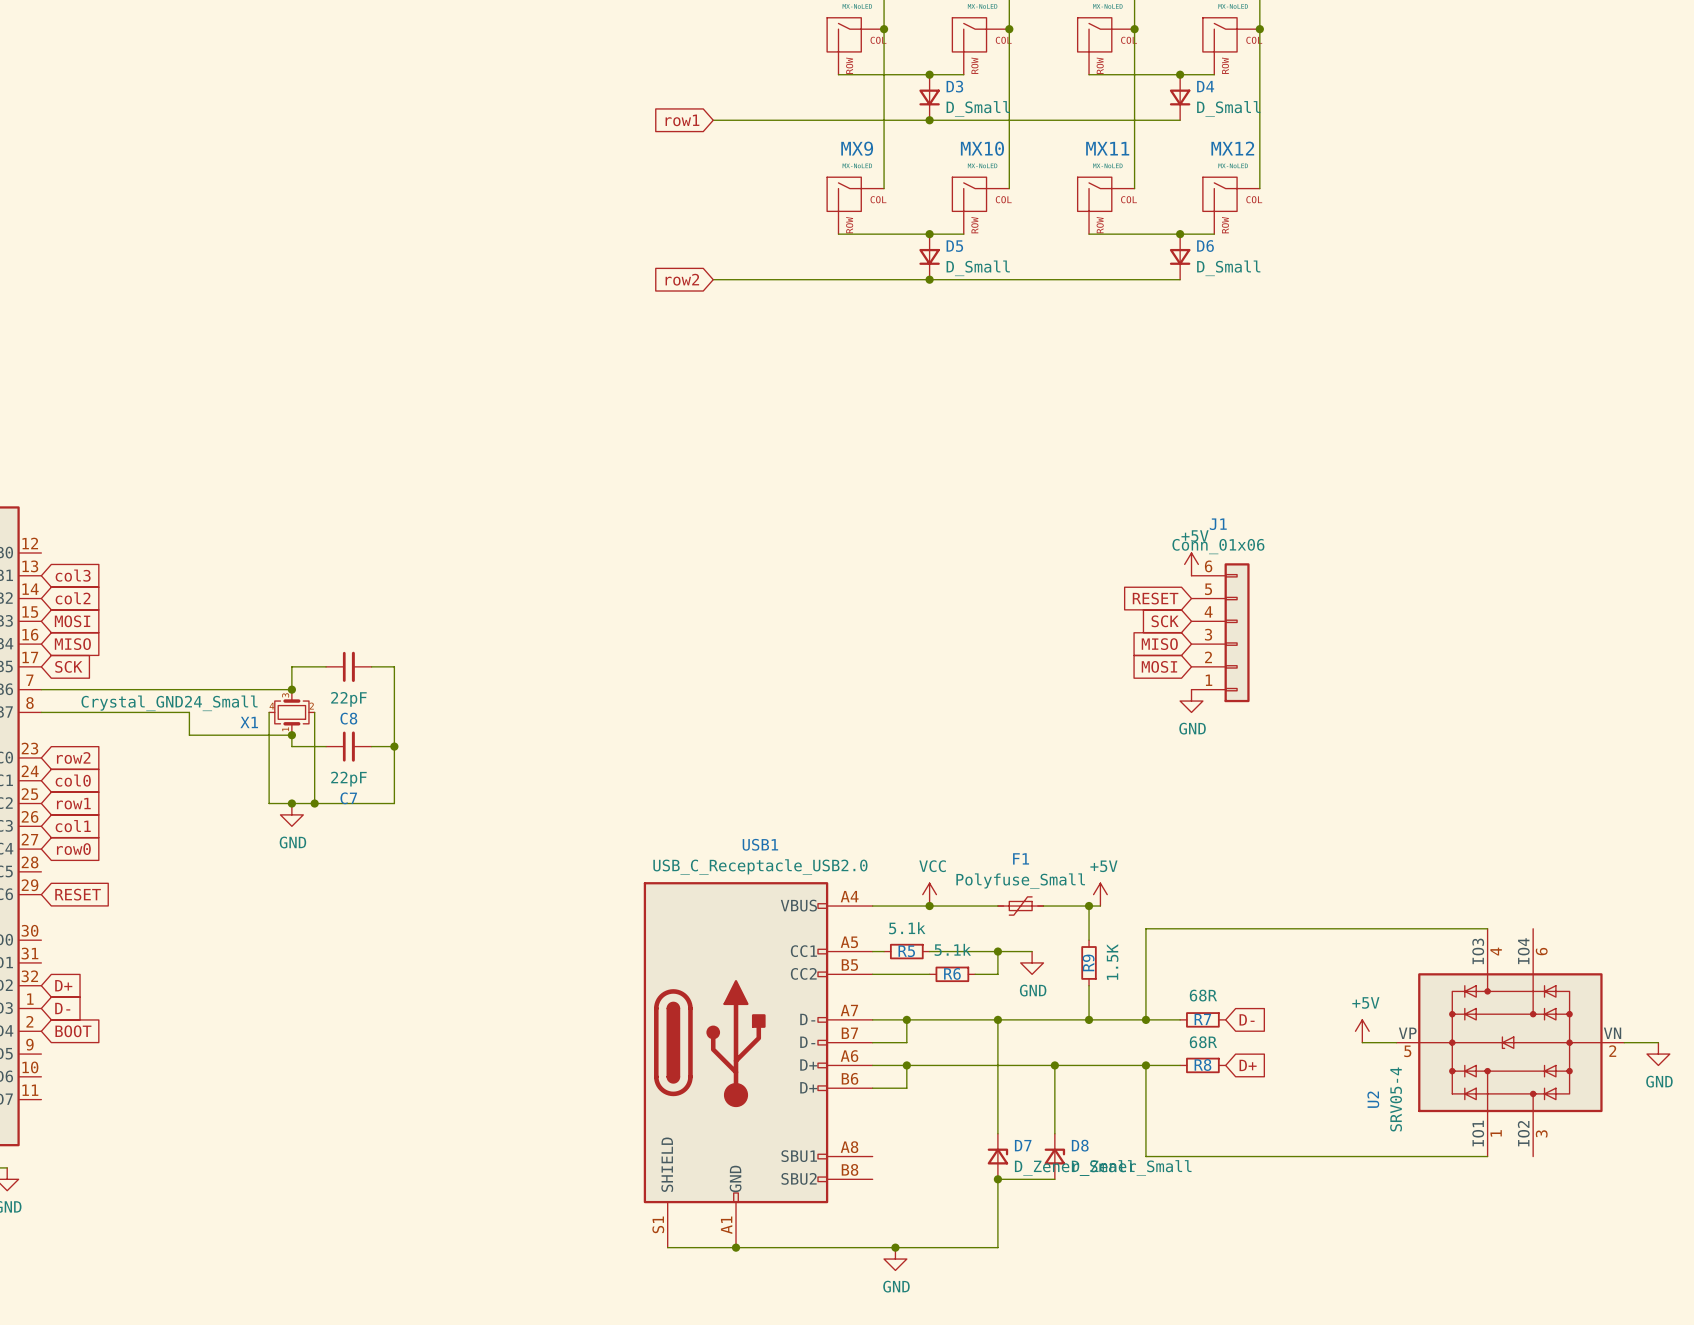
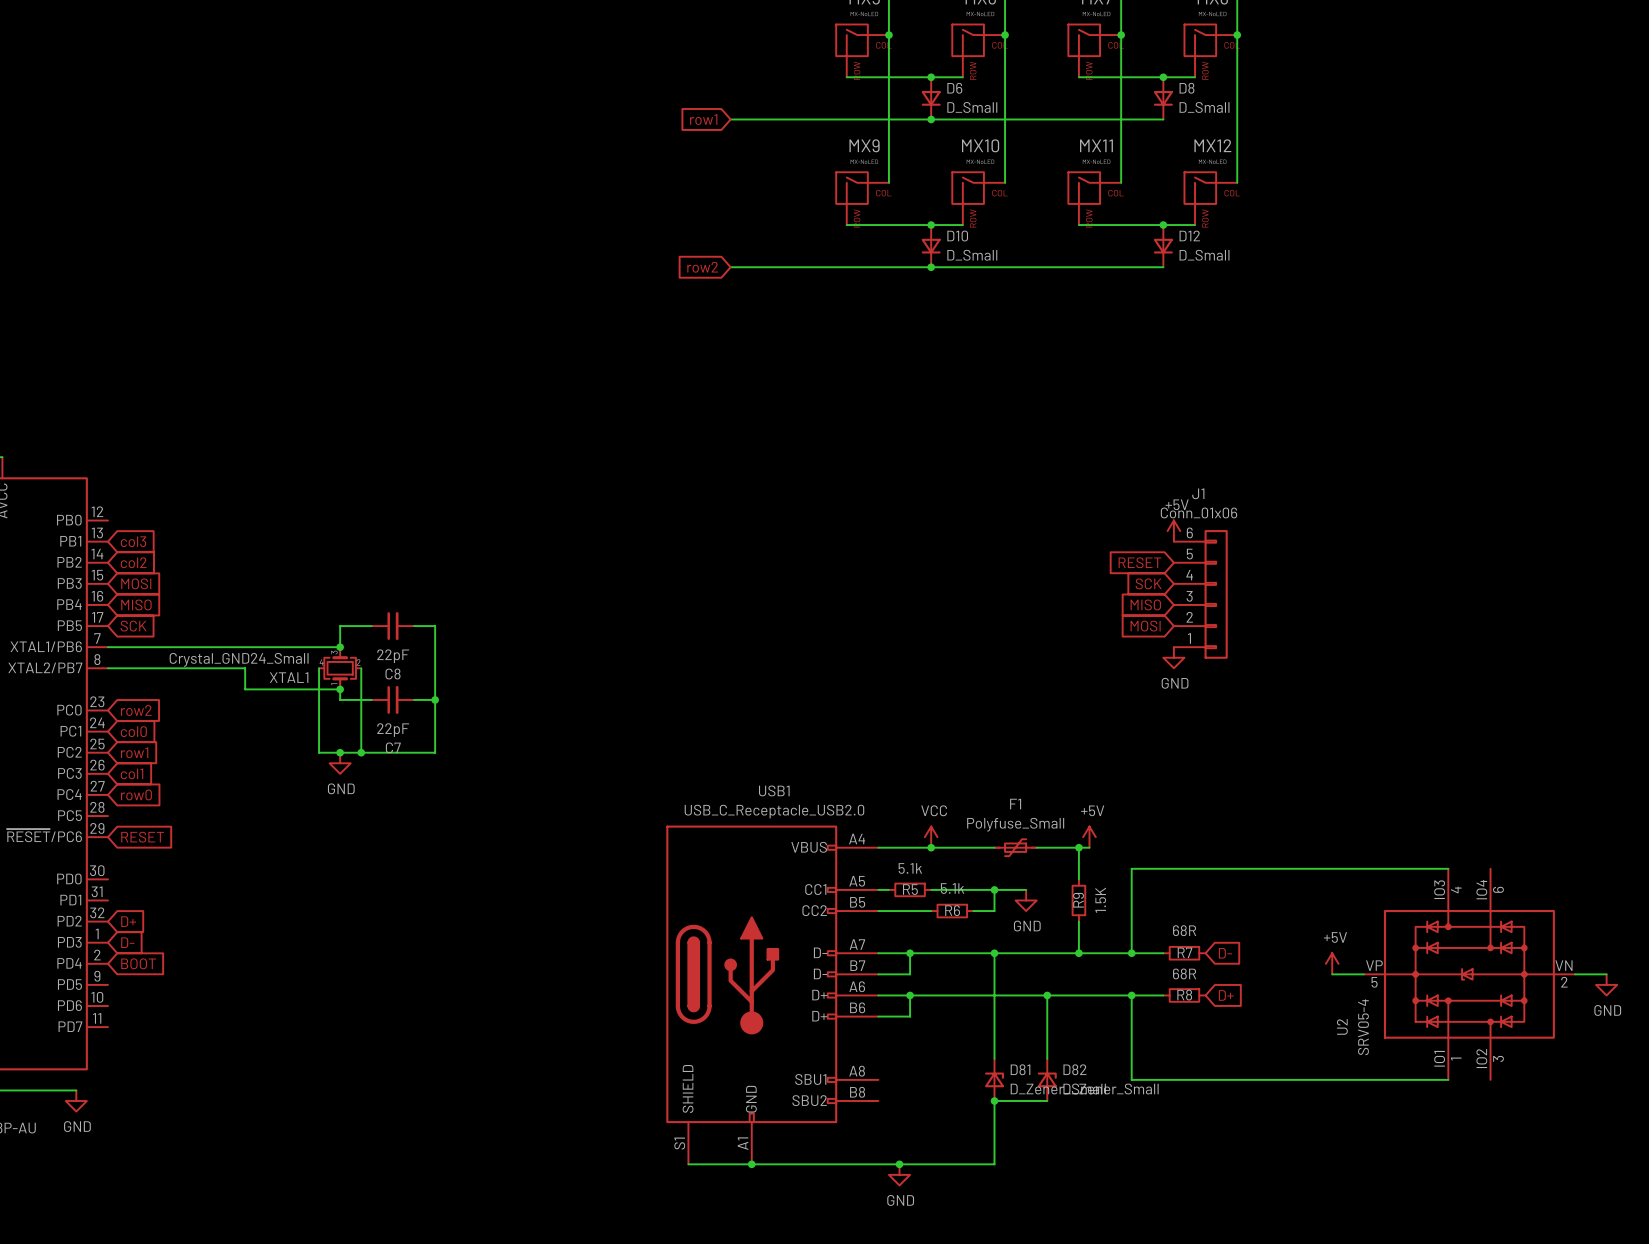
D3 name: D3 (954, 86) -> D6 (954, 88)
D4 name: D4 (1205, 86) -> D8 (1186, 88)
D5 name: D5 (954, 246) -> D10 (957, 236)
D6 name: D6 (1205, 246) -> D12 (1189, 235)
X1 name: X1 (249, 722) -> XTAL1 (289, 677)
D7 name: D7 (1023, 1145) -> D81 (1020, 1069)
D8 name: D8 (1080, 1145) -> D82 (1074, 1069)

